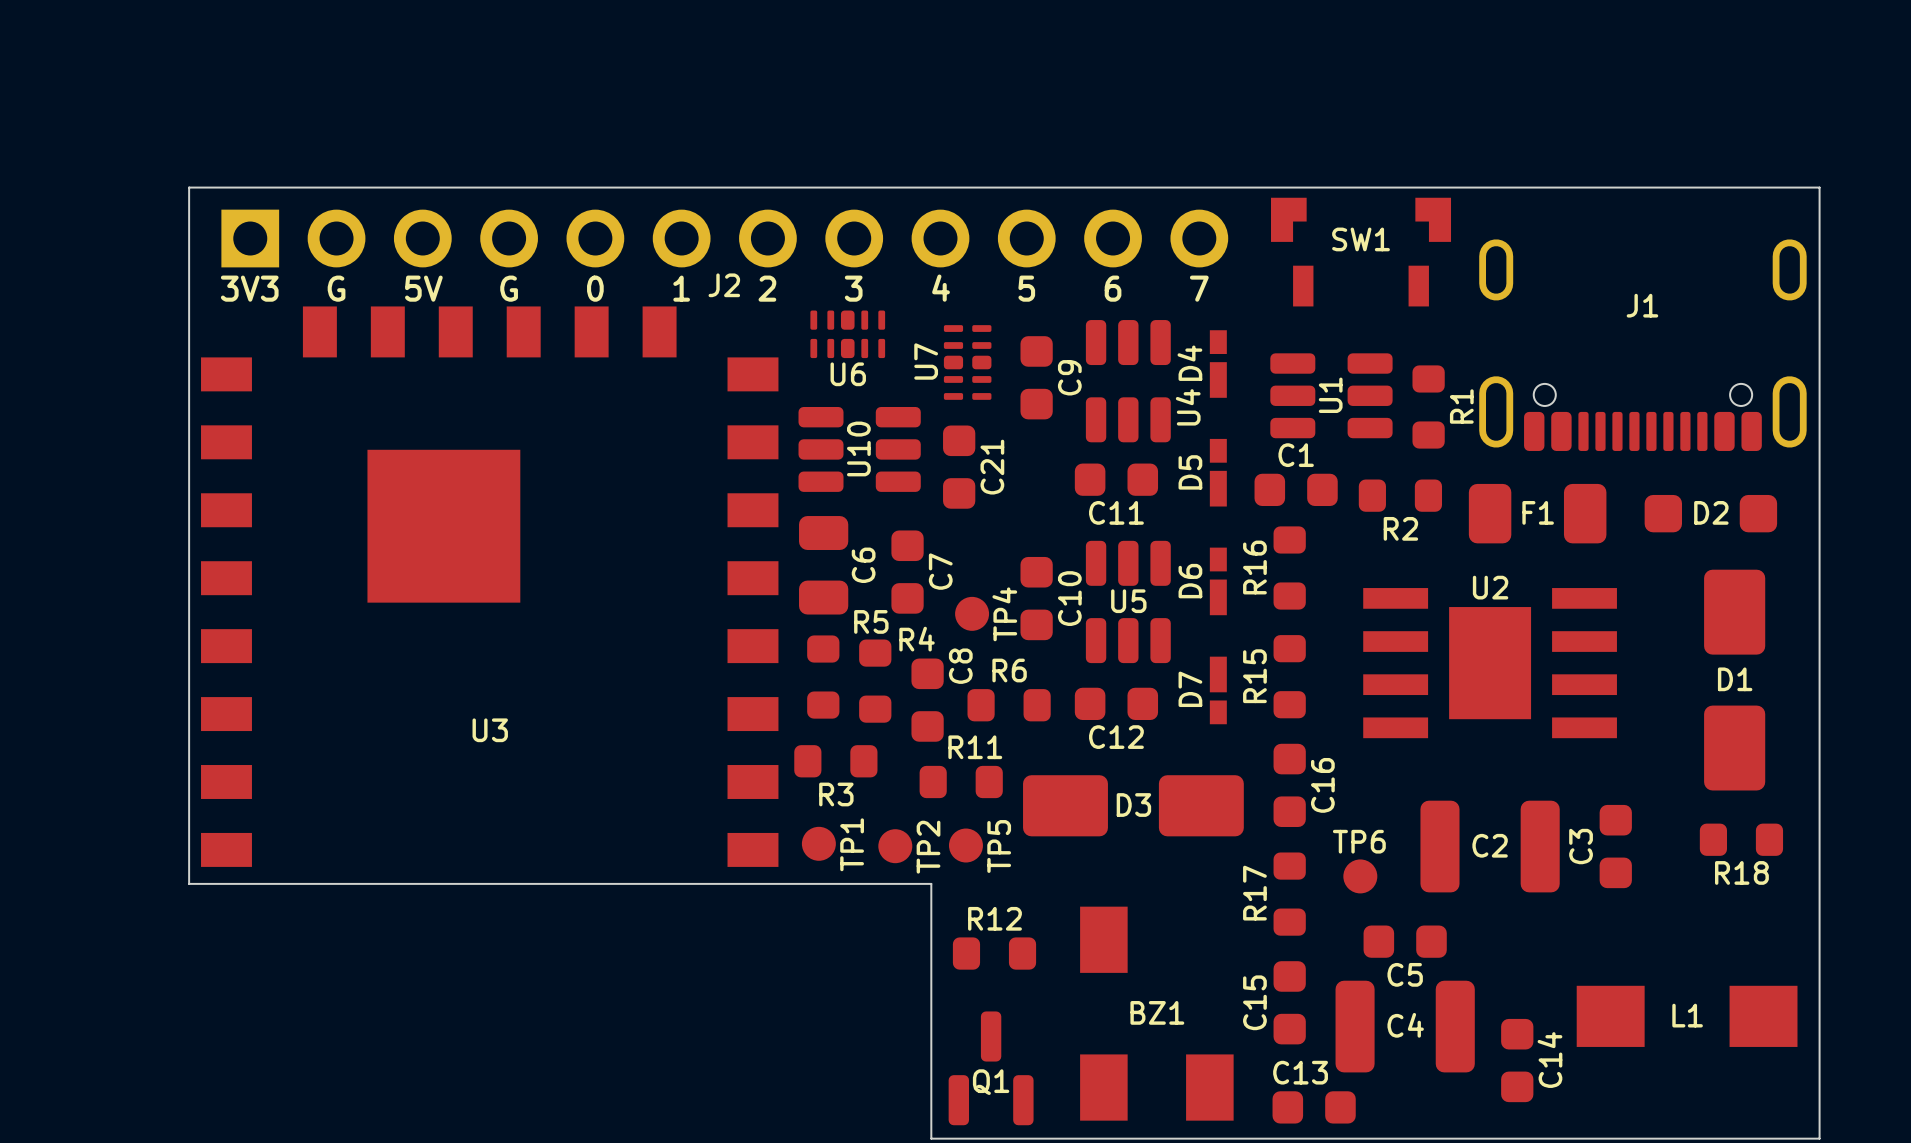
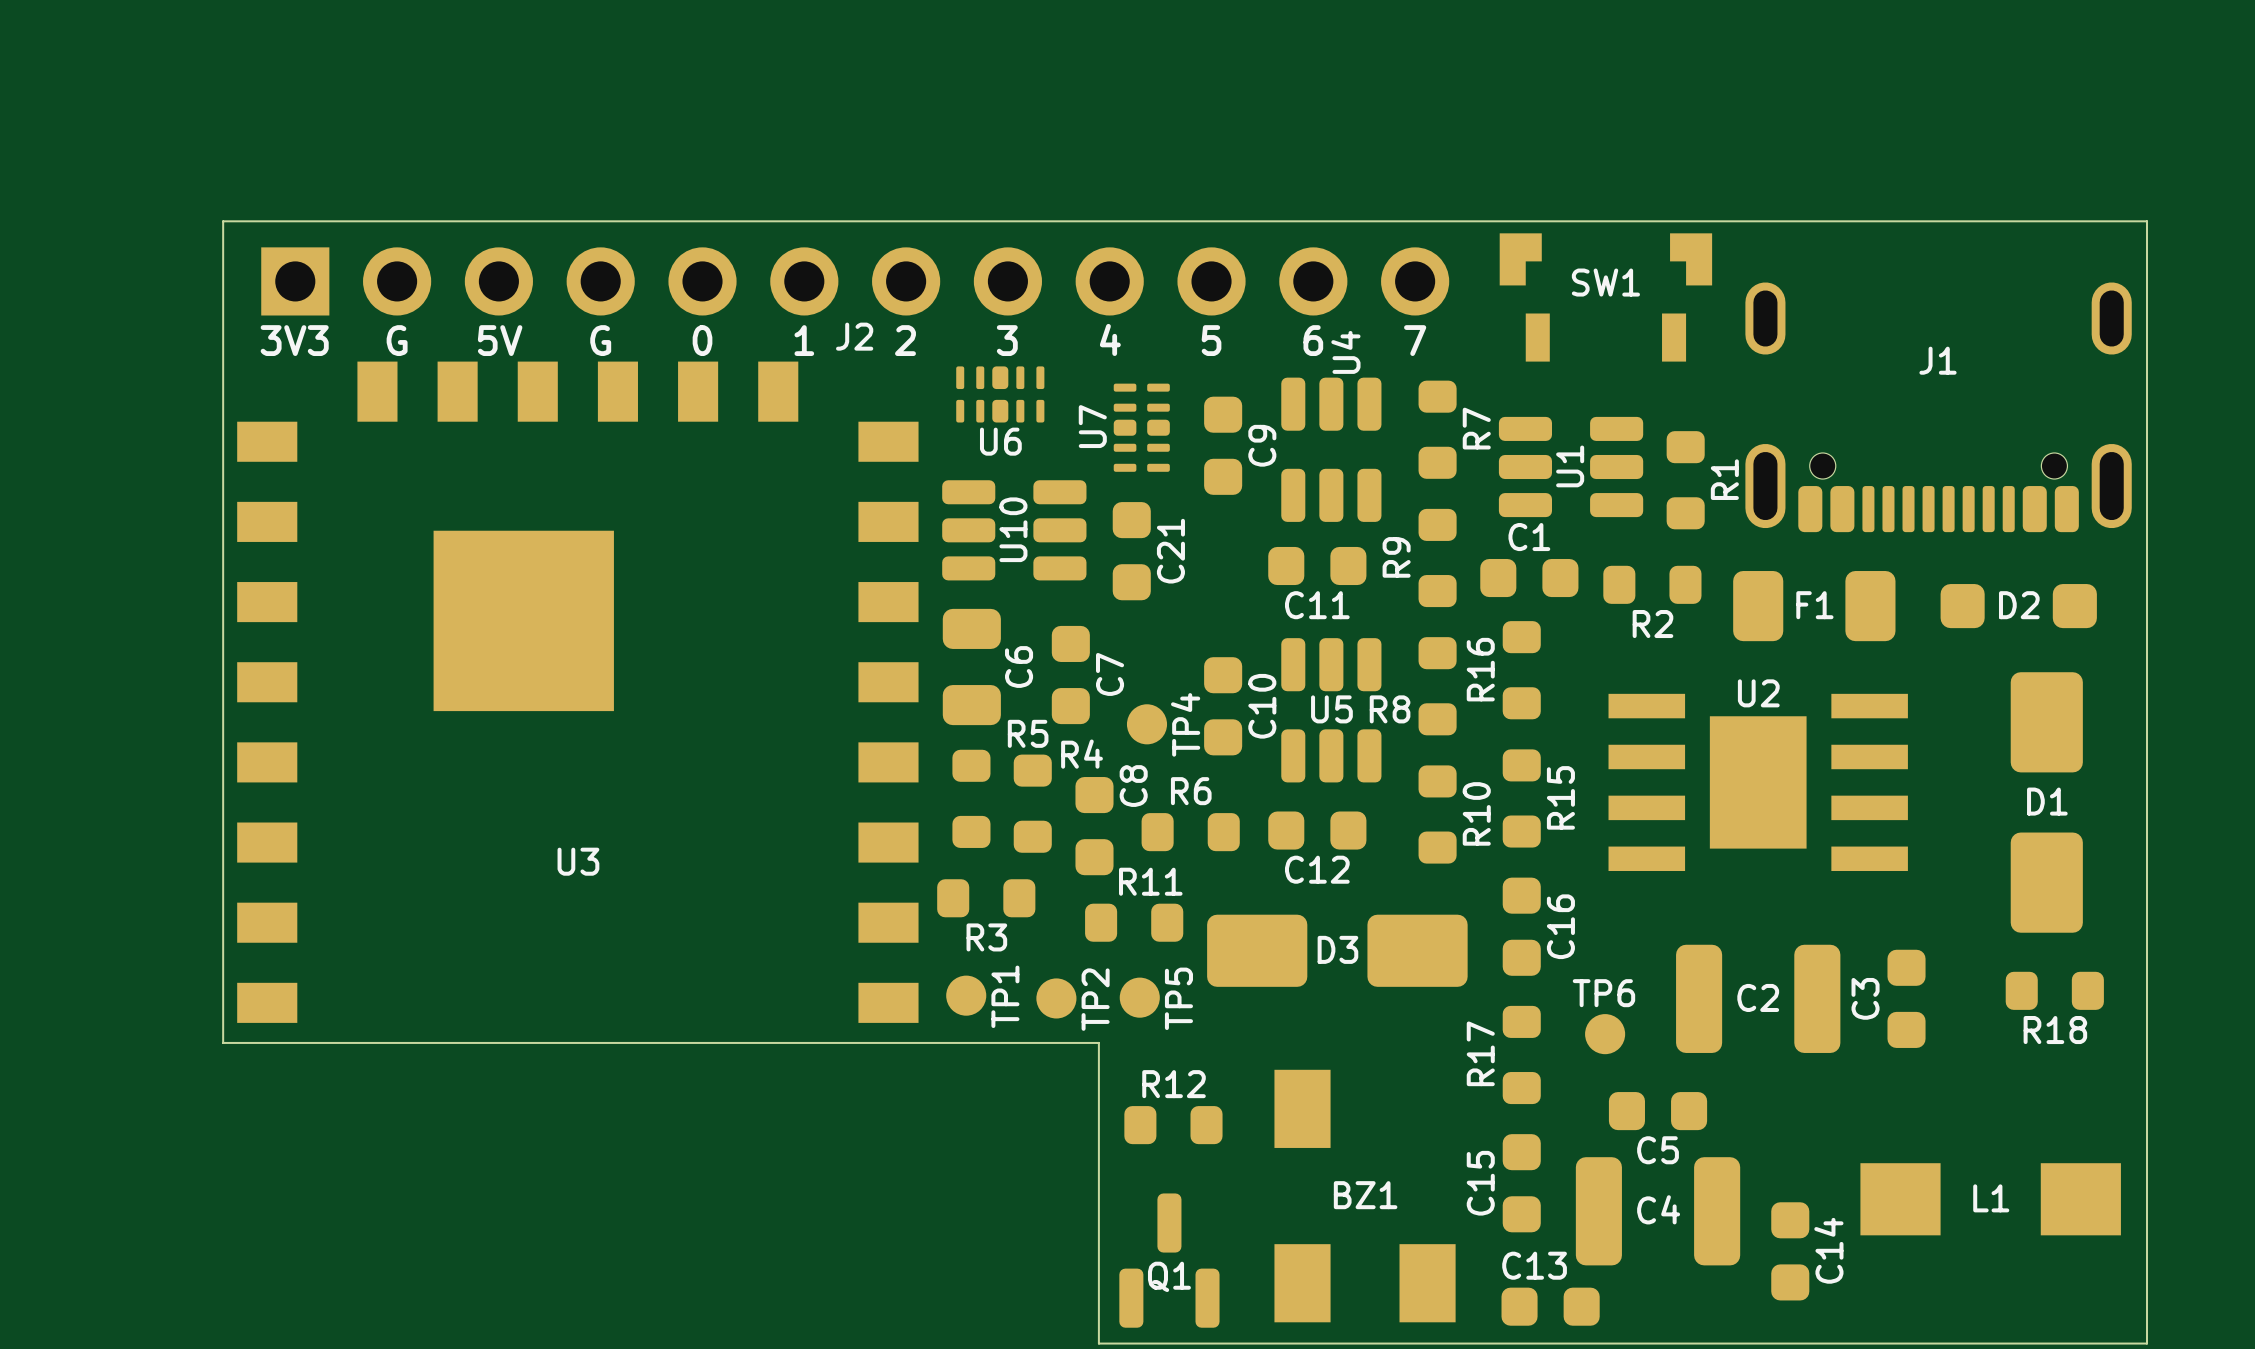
D4: (1218, 364) -> none
R7: none -> (1437, 429)
U4 name position: U4 (1188, 407) -> U4 (1345, 352)
D5: (1218, 472) -> none
R9: none -> (1437, 557)
D6: (1218, 581) -> none
R8: none -> (1437, 686)
R15 name position: R15 (1254, 676) -> R15 (1560, 797)
D7: (1218, 690) -> none
R10: none -> (1437, 814)

